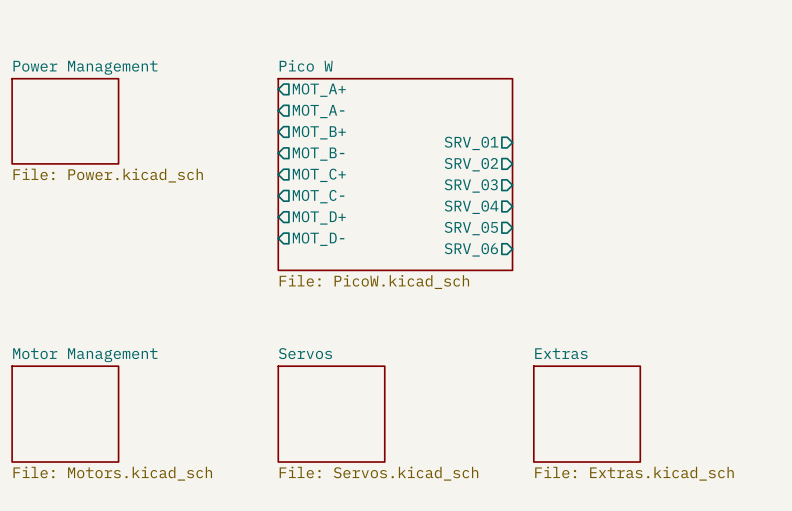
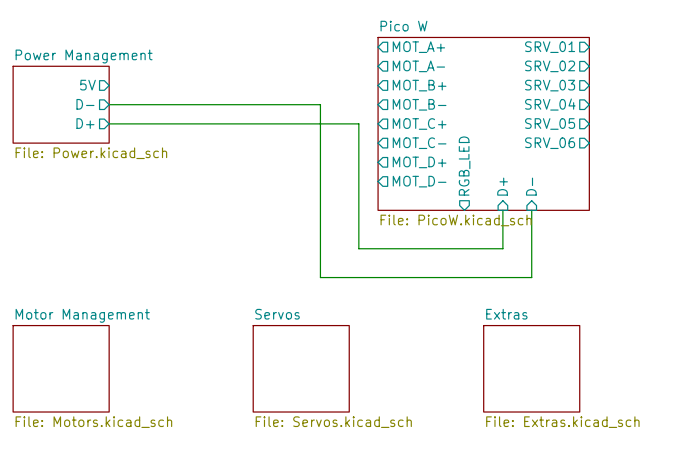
sheet pin position: MOT_A+ (319, 90) -> MOT_A+ (418, 47)
sheet pin: none -> 5V (87, 85)
sheet pin position: MOT_A- (318, 111) -> MOT_A- (418, 66)
sheet pin: none -> D- (85, 104)
wire: none -> (109, 104) (320, 104) (320, 277) (531, 277) (531, 210)
sheet pin position: MOT_B+ (319, 132) -> MOT_B+ (419, 85)
sheet pin: none -> D+ (85, 123)
wire: none -> (109, 123) (358, 123) (358, 248) (502, 248) (502, 210)
sheet pin position: SRV_01 (471, 143) -> SRV_01 (550, 47)
sheet pin position: MOT_B- (318, 154) -> MOT_B- (419, 104)
sheet pin position: SRV_02 (471, 164) -> SRV_02 (550, 66)
sheet Pico W position: (395, 174) -> (483, 123)
sheet pin position: MOT_C+ (319, 175) -> MOT_C+ (419, 123)
sheet pin position: SRV_03 (471, 185) -> SRV_03 (550, 85)
sheet pin: none -> RGB_LED (464, 166)
sheet pin position: MOT_C- (318, 196) -> MOT_C- (419, 143)
sheet pin position: SRV_04 (471, 207) -> SRV_04 (550, 104)
sheet pin: none -> D+ (502, 186)
sheet pin: none -> D- (531, 186)
sheet pin position: MOT_D+ (319, 217) -> MOT_D+ (419, 162)
sheet pin position: SRV_05 (471, 228) -> SRV_05 (550, 123)
sheet pin position: MOT_D- (318, 239) -> MOT_D- (419, 181)
sheet pin position: SRV_06 (471, 249) -> SRV_06 (550, 143)

